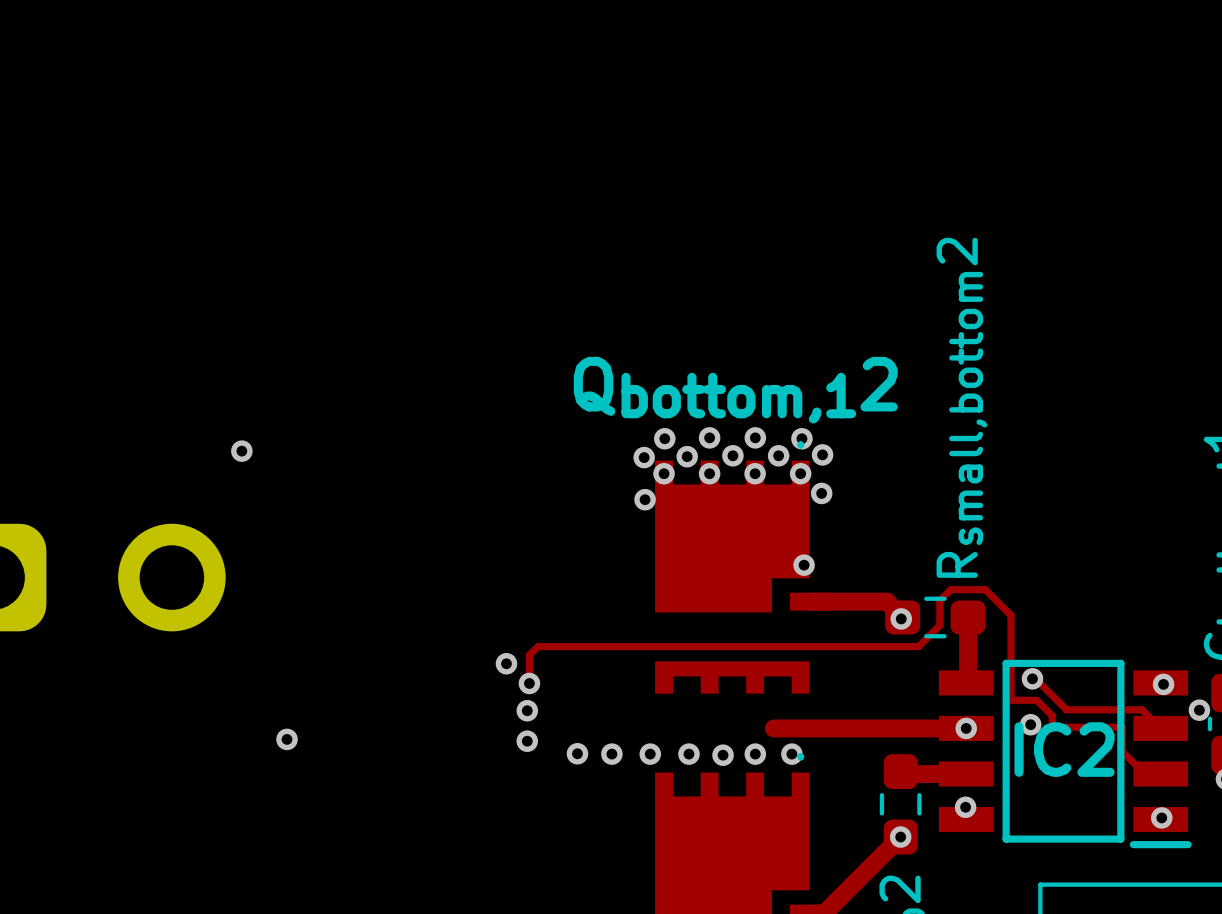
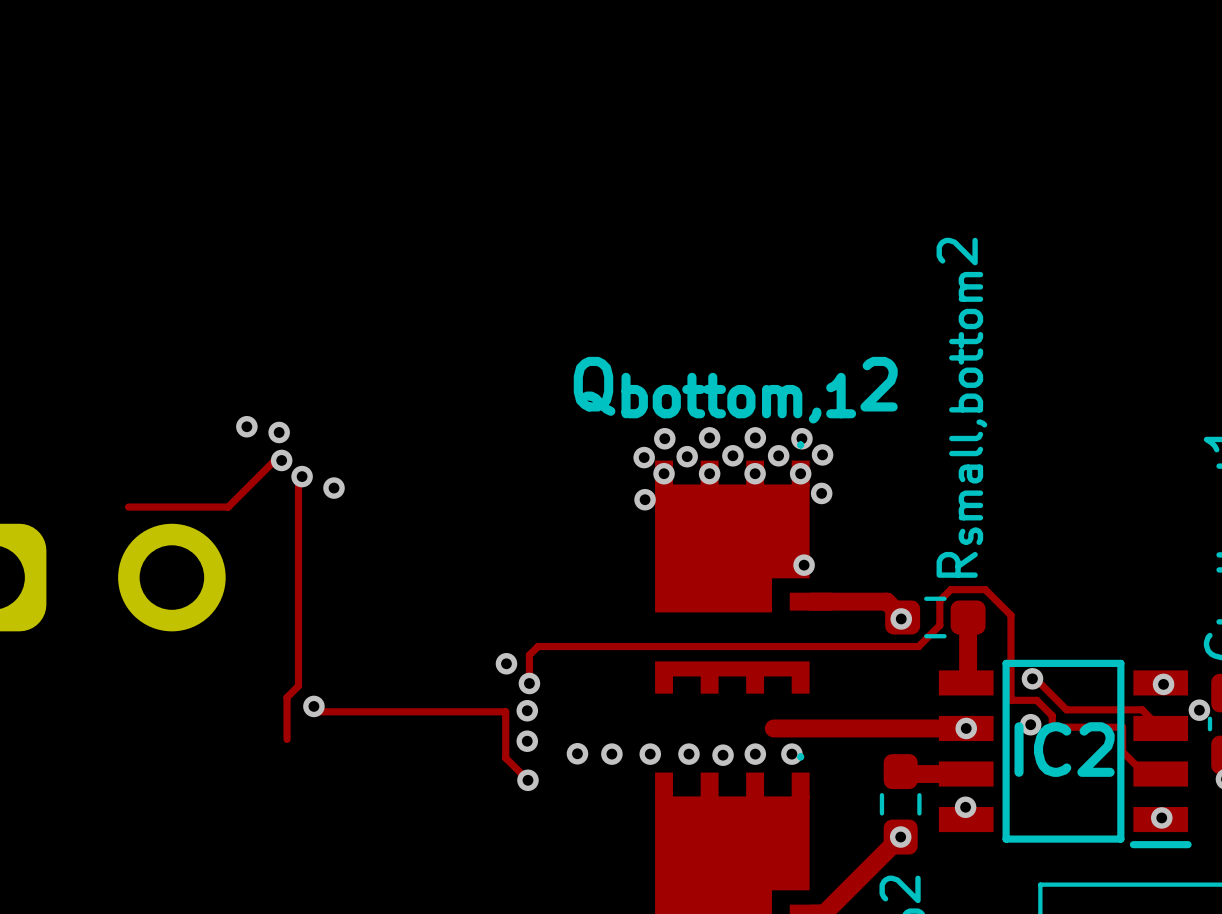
via: none -> (246, 426)
via: none -> (279, 432)
via: (241, 451) -> none
track: none -> (280, 455) (228, 507) (128, 507)
via: none -> (281, 460)
track: none -> (302, 476) (298, 480) (298, 685) (287, 697) (287, 739)
via: none -> (302, 476)
via: none -> (334, 488)
track: none -> (313, 706) (319, 711) (505, 711) (505, 758) (527, 780)
via position: (287, 739) -> (313, 706)
via: none -> (527, 780)

